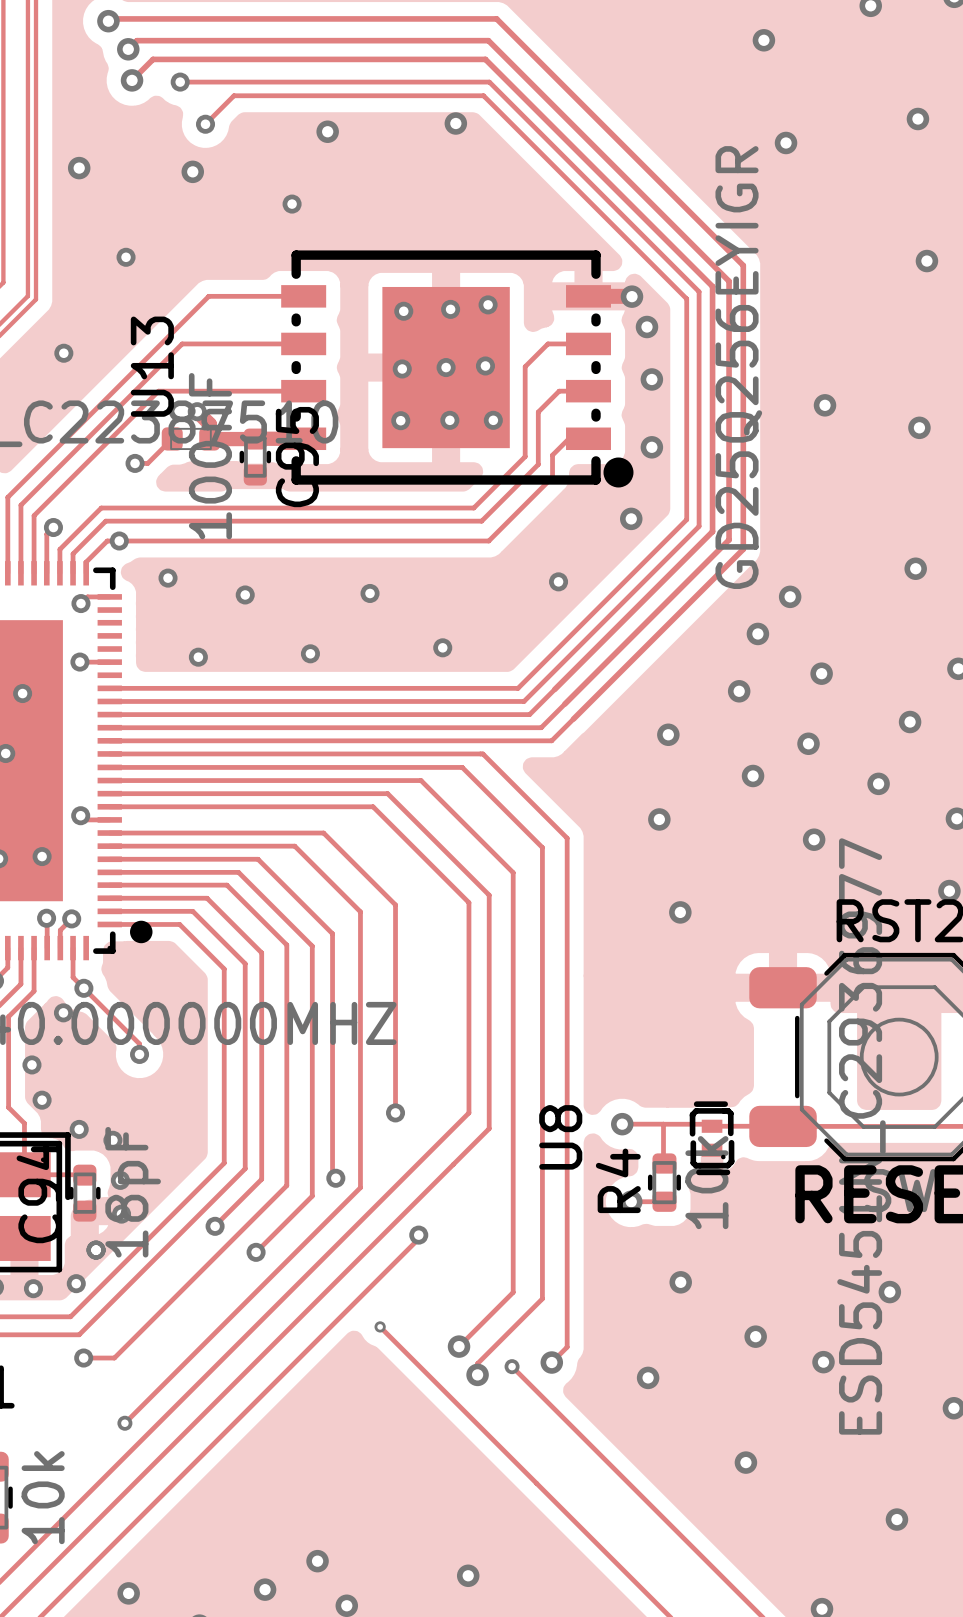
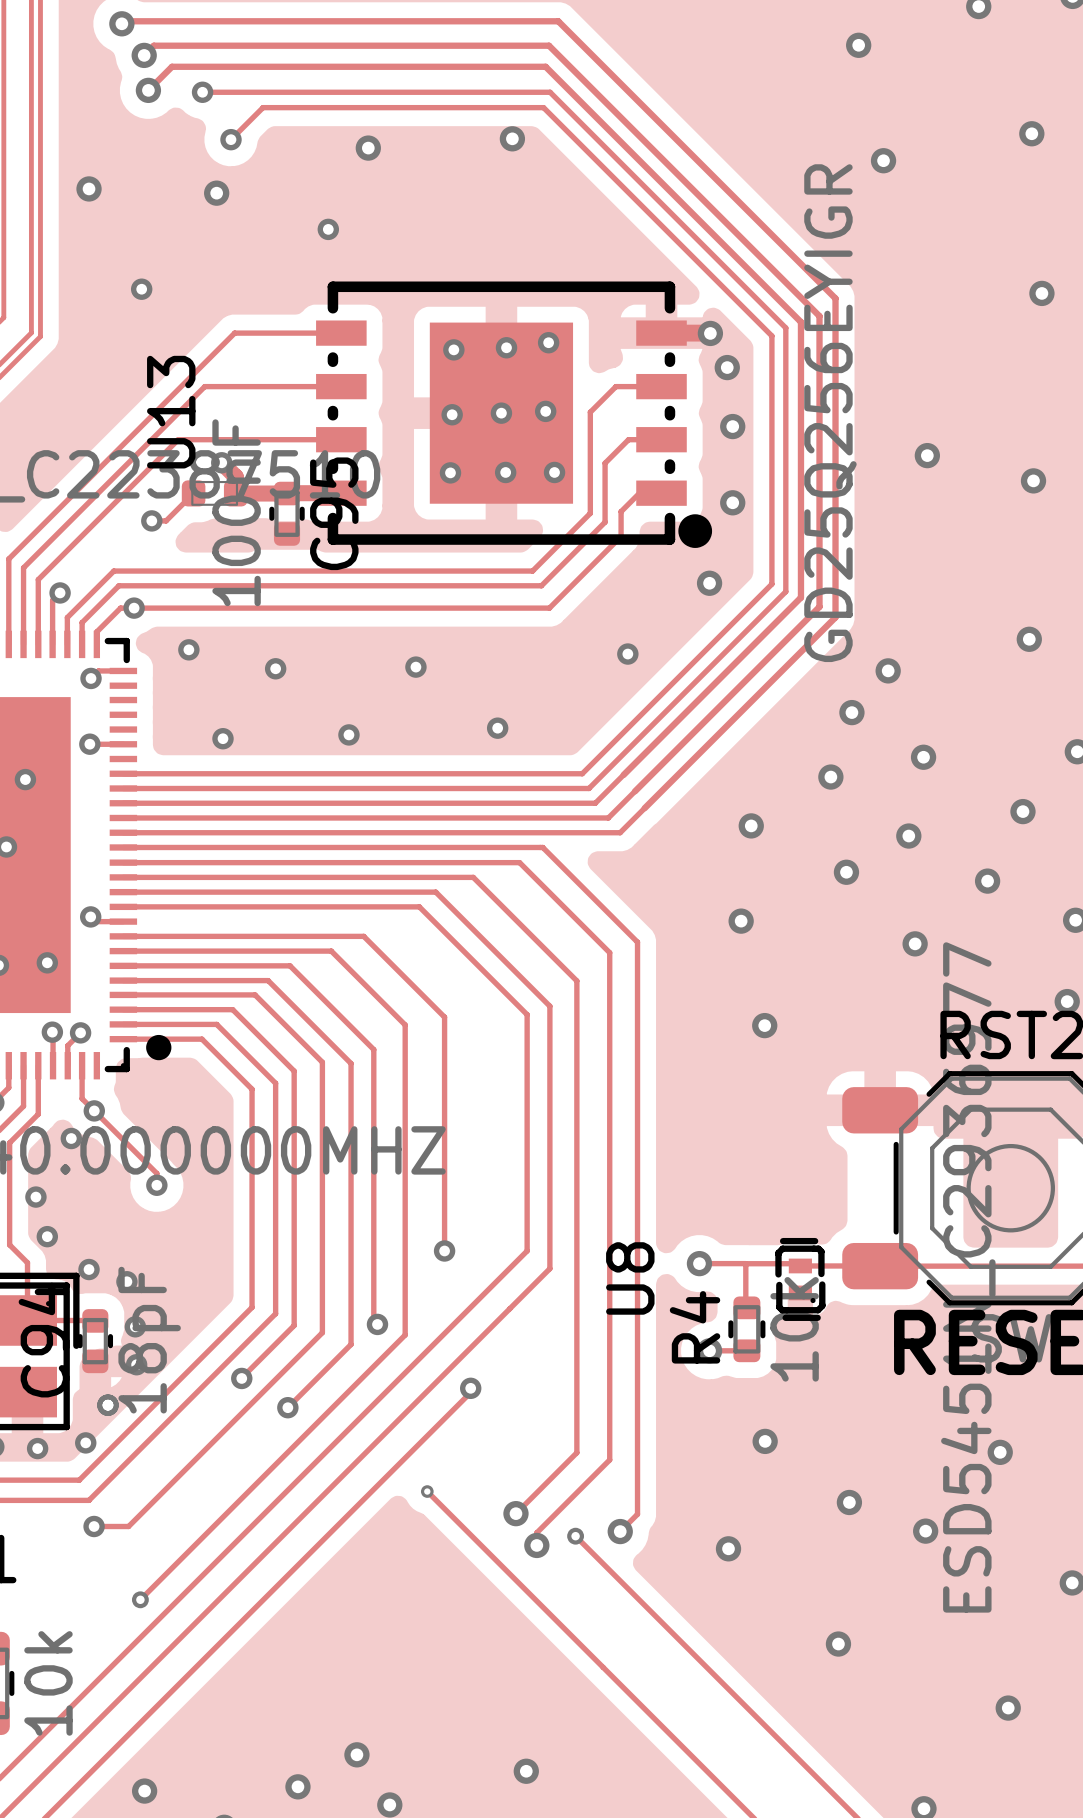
via: (63, 353) -> none

